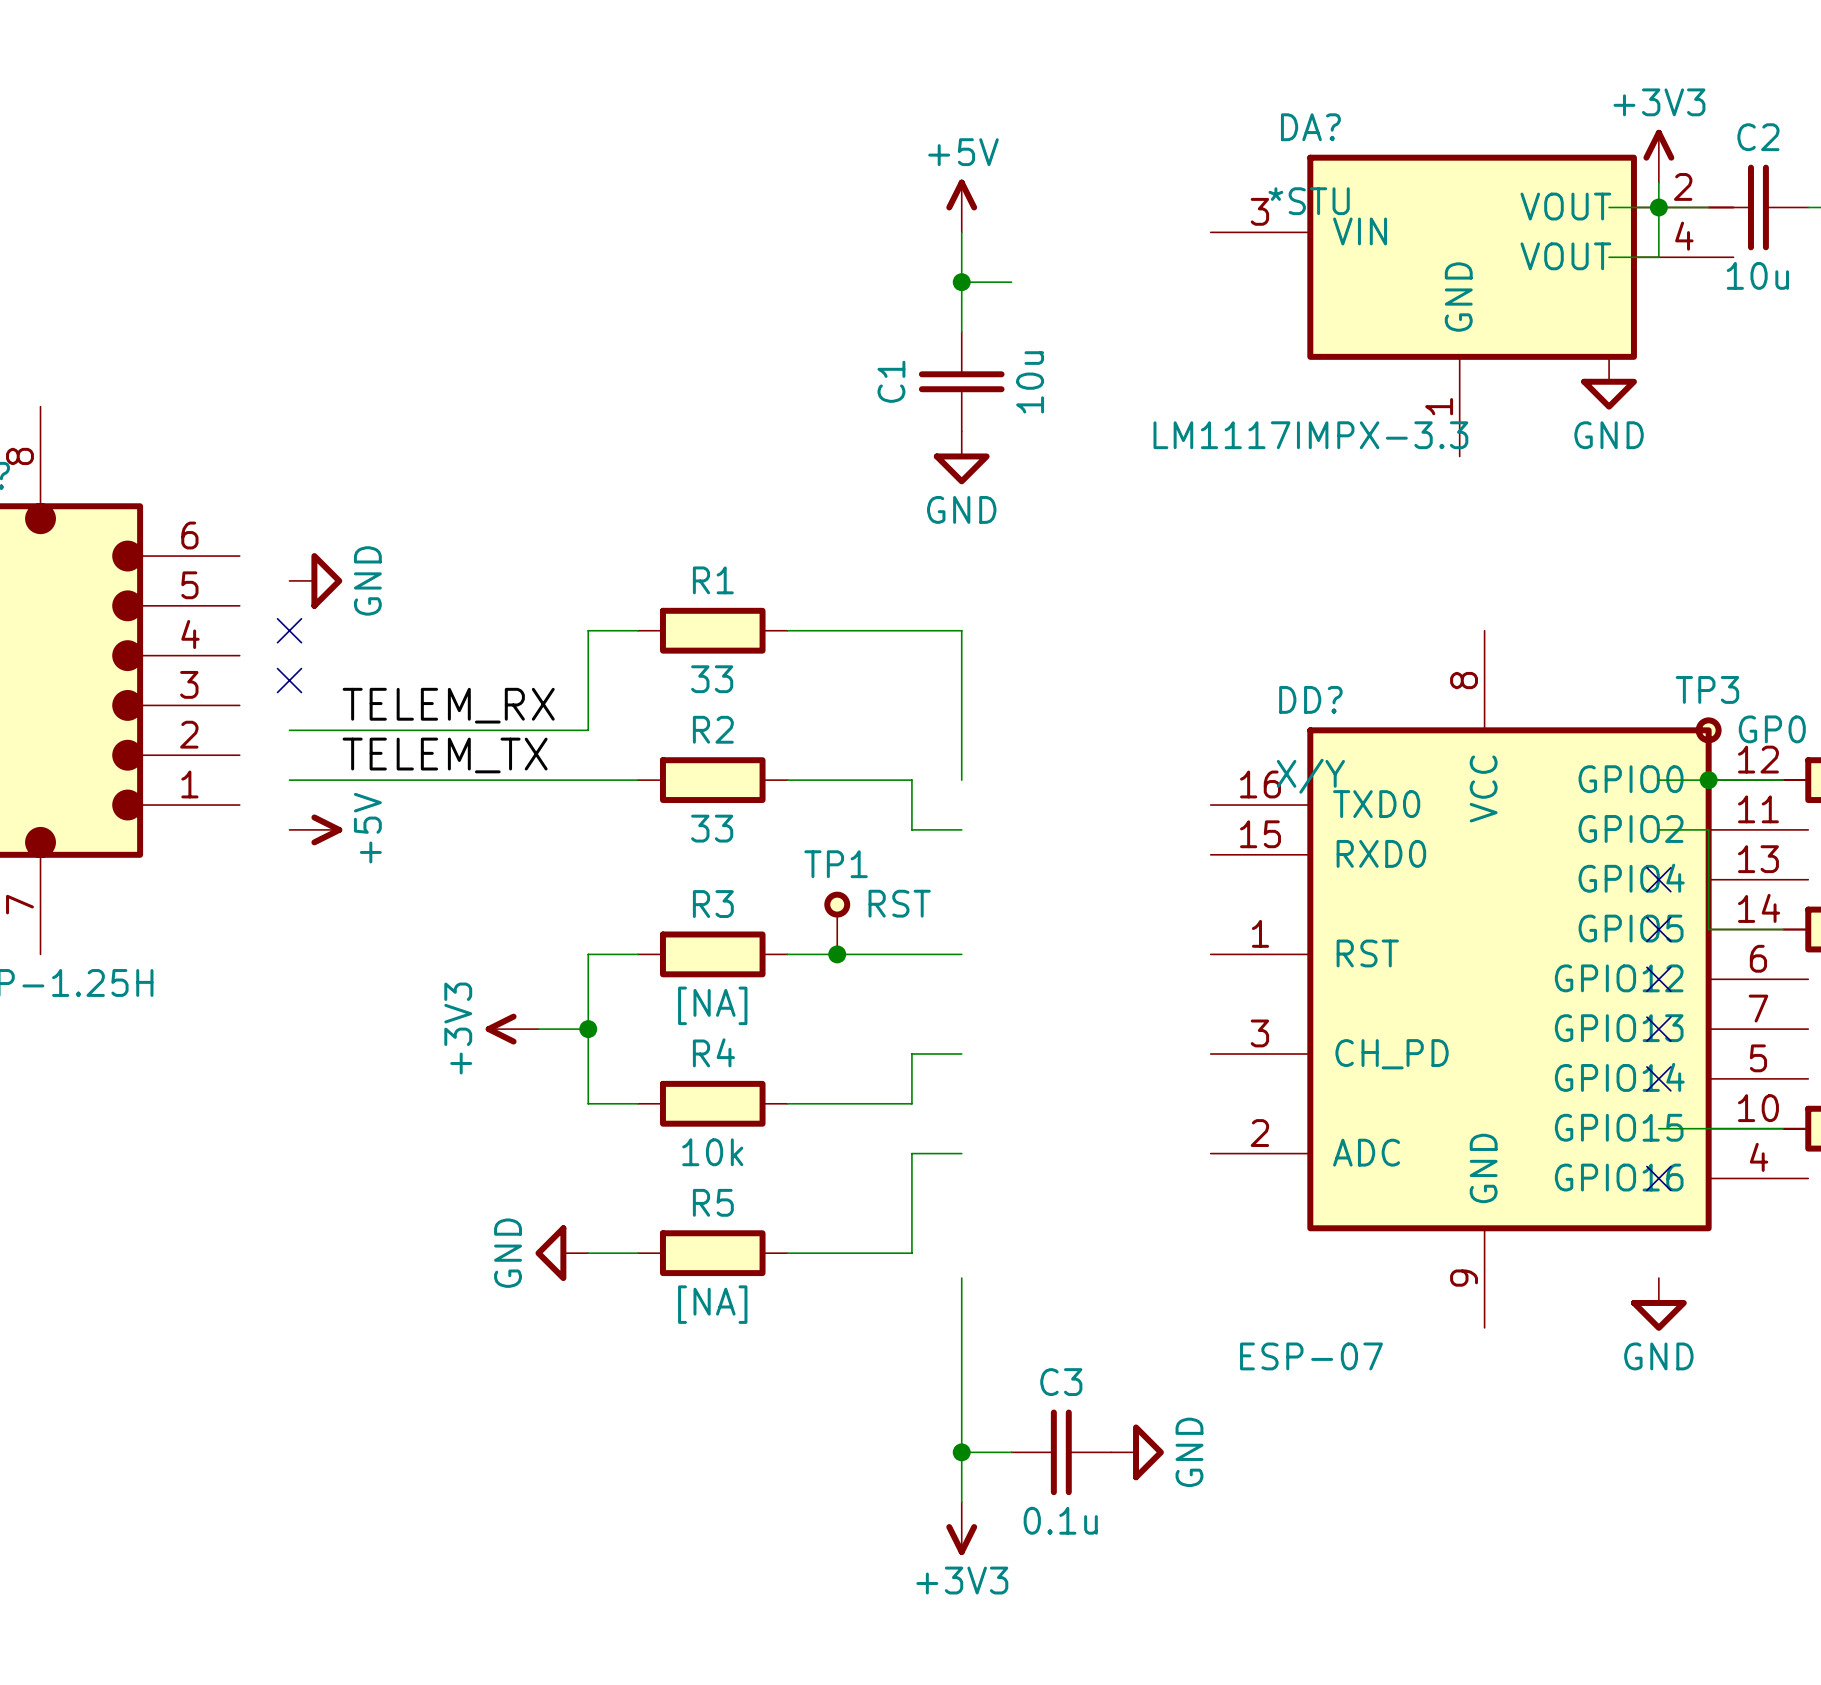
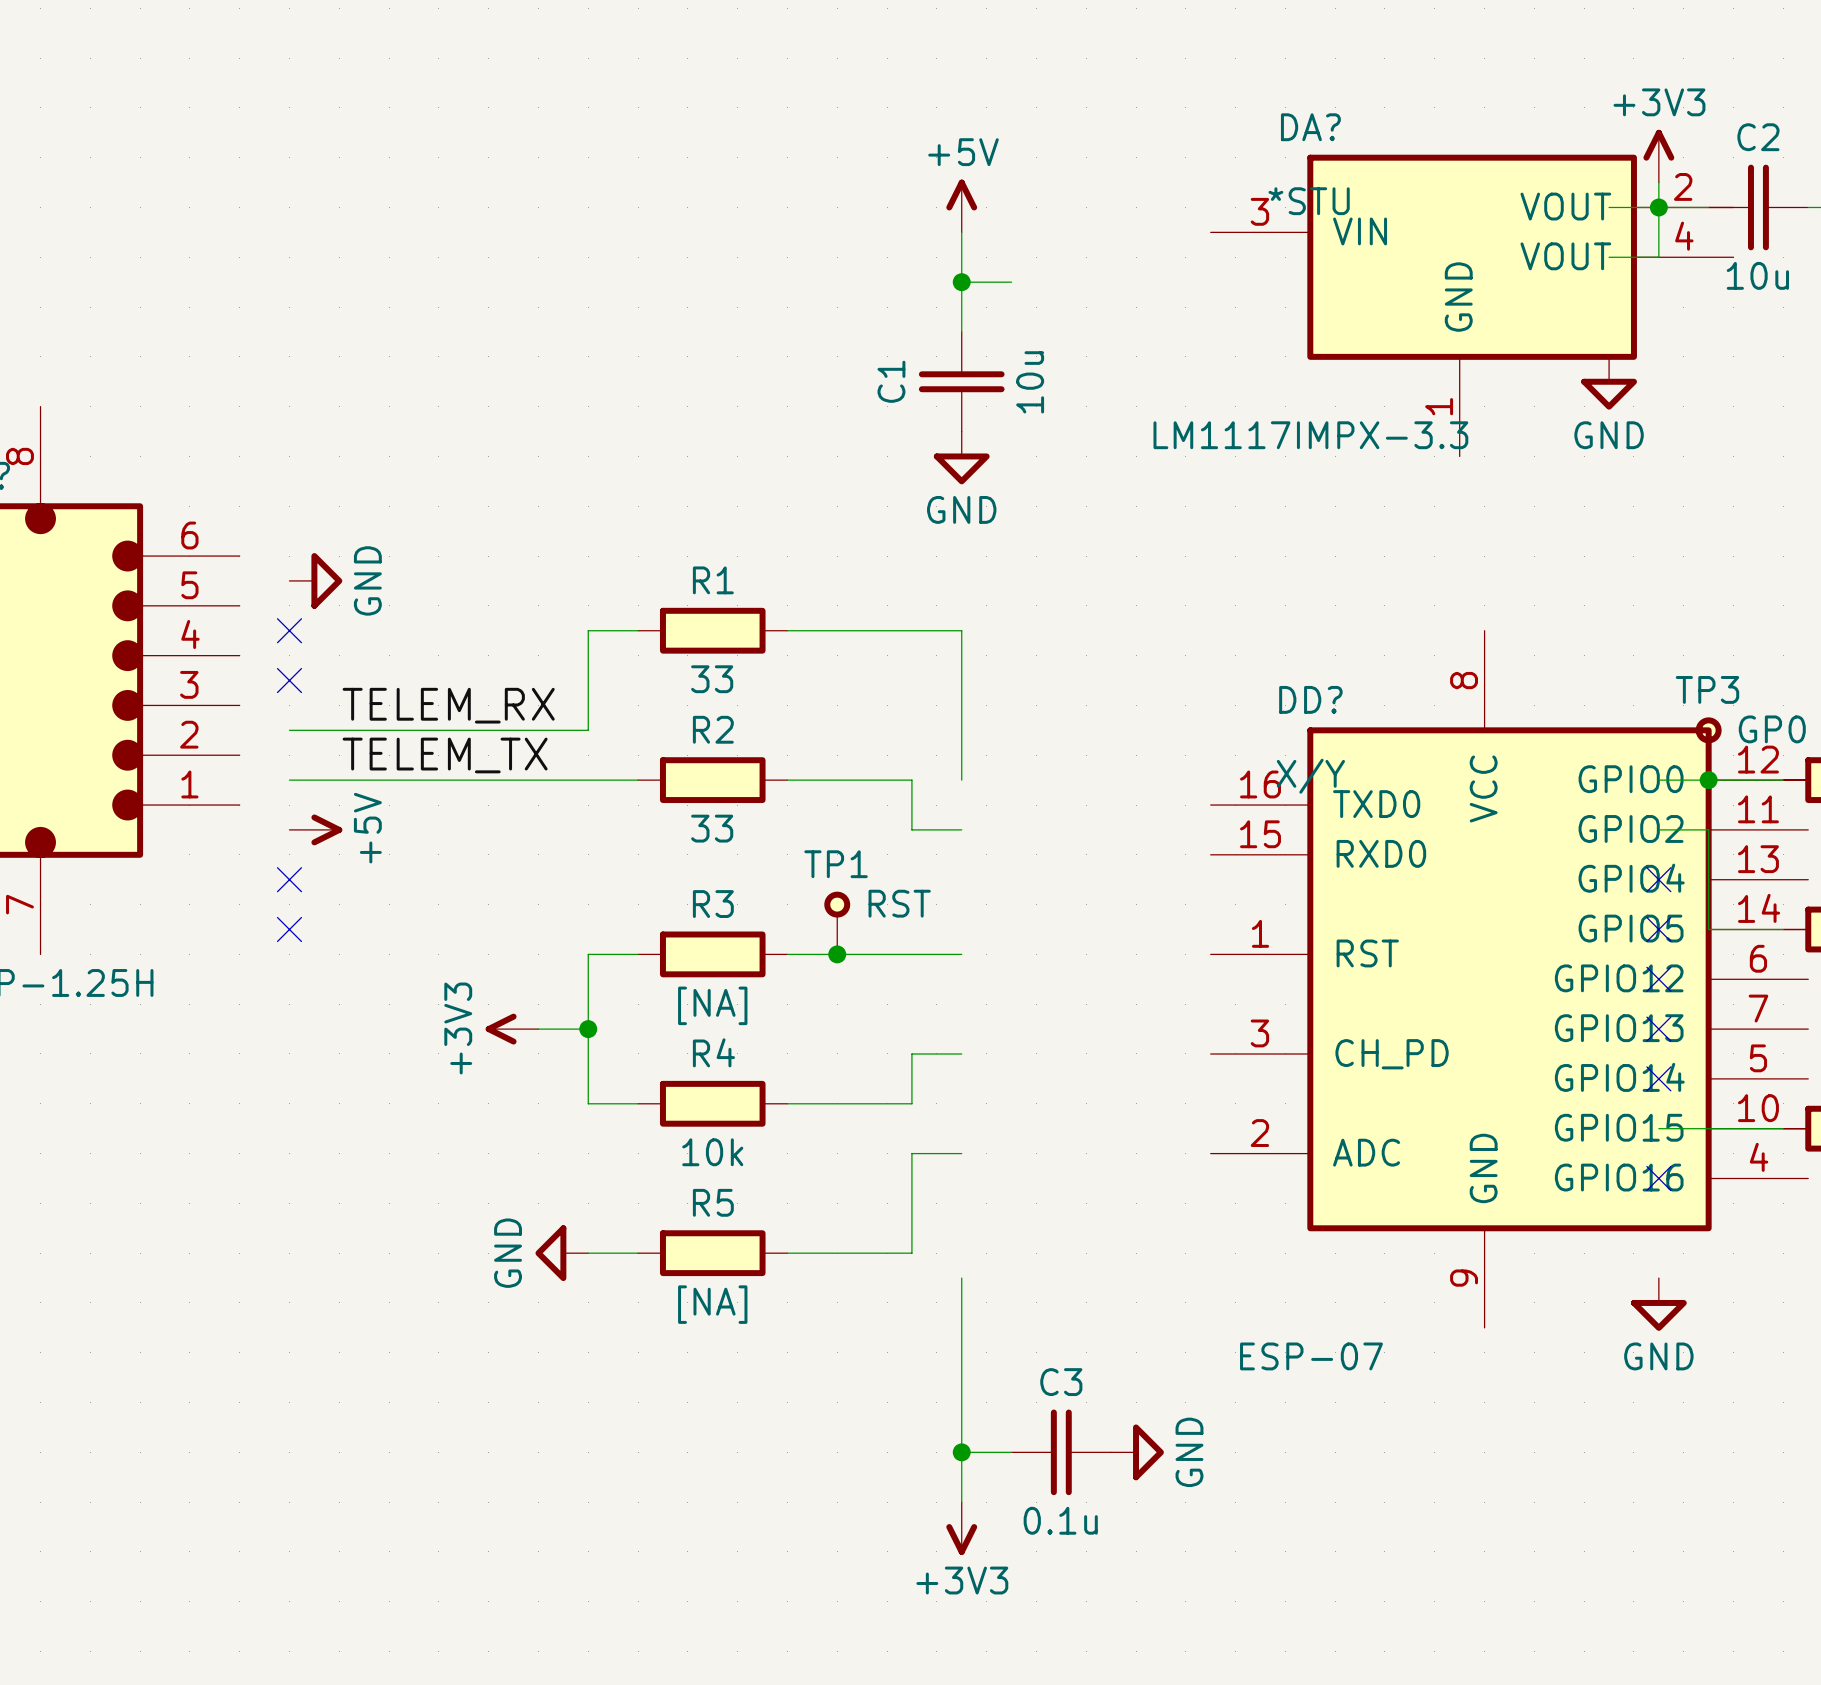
no-connect mark: none -> (289, 879)
no-connect mark: none -> (289, 929)

